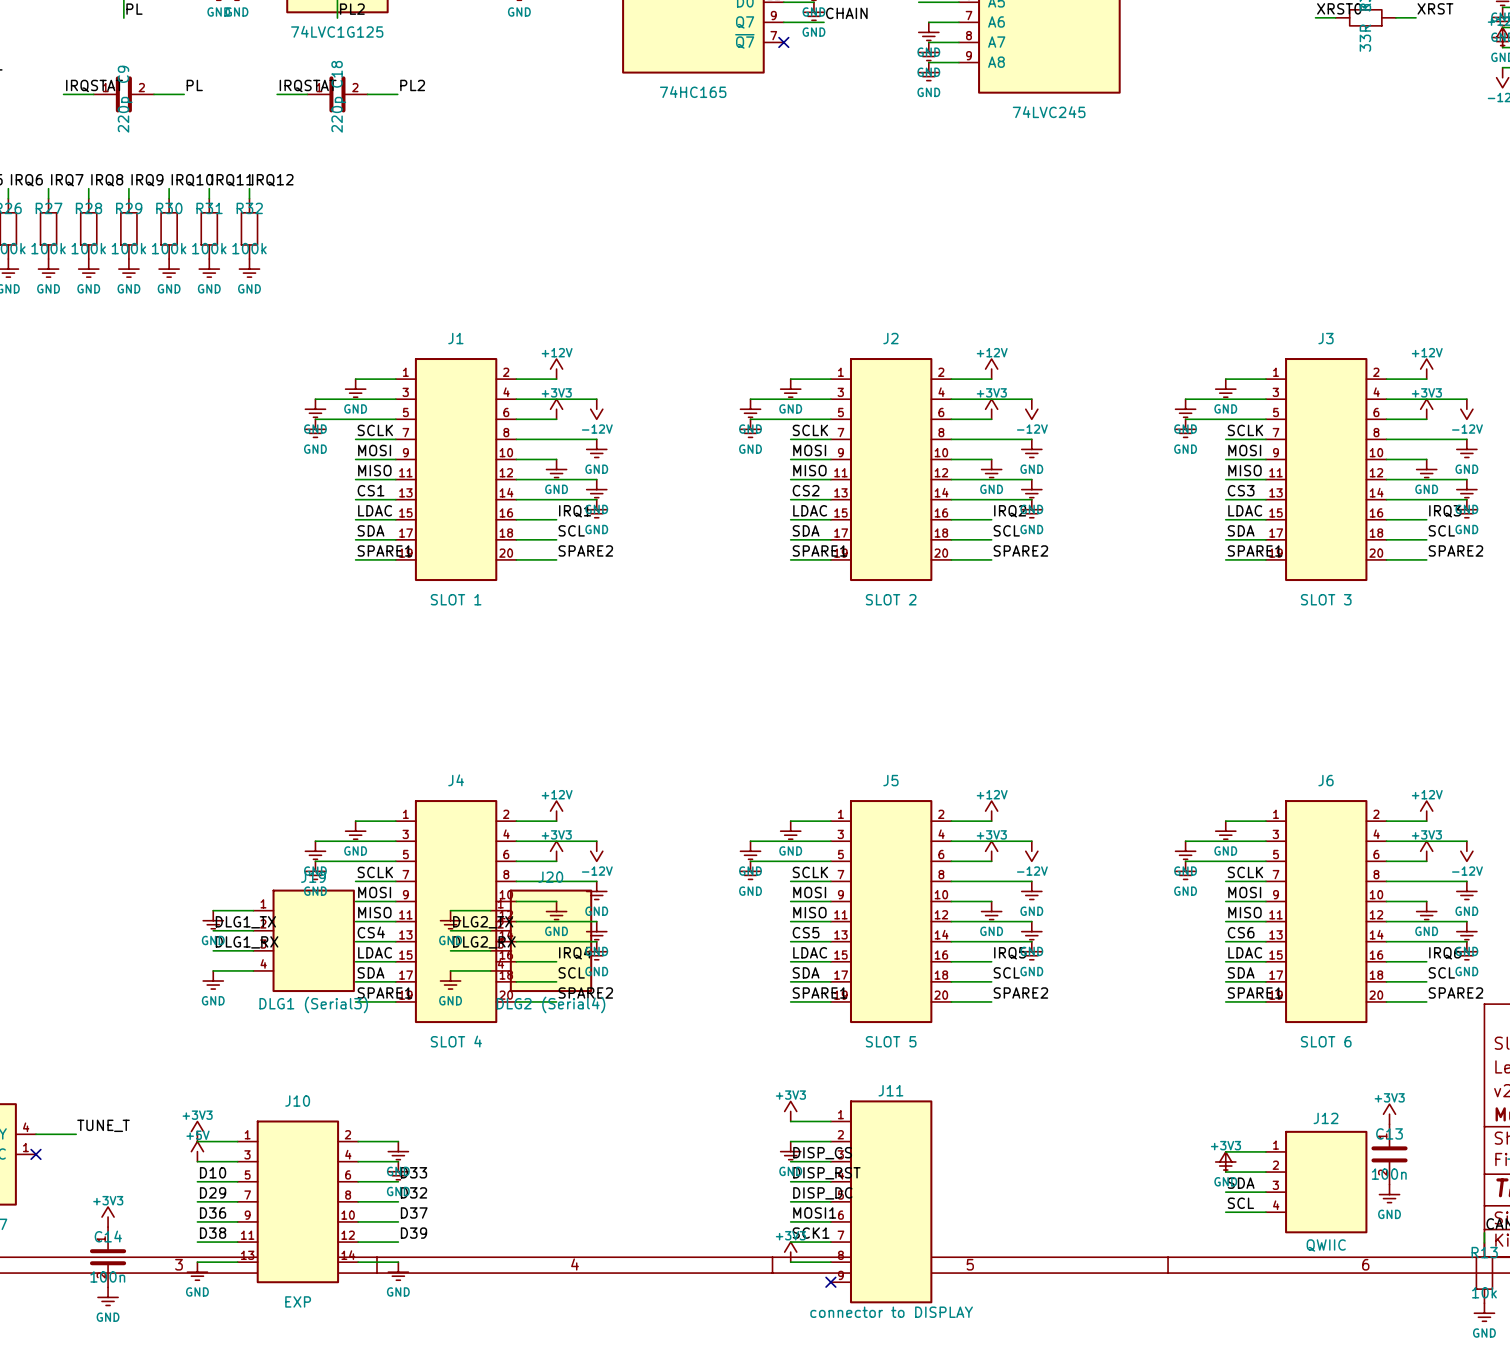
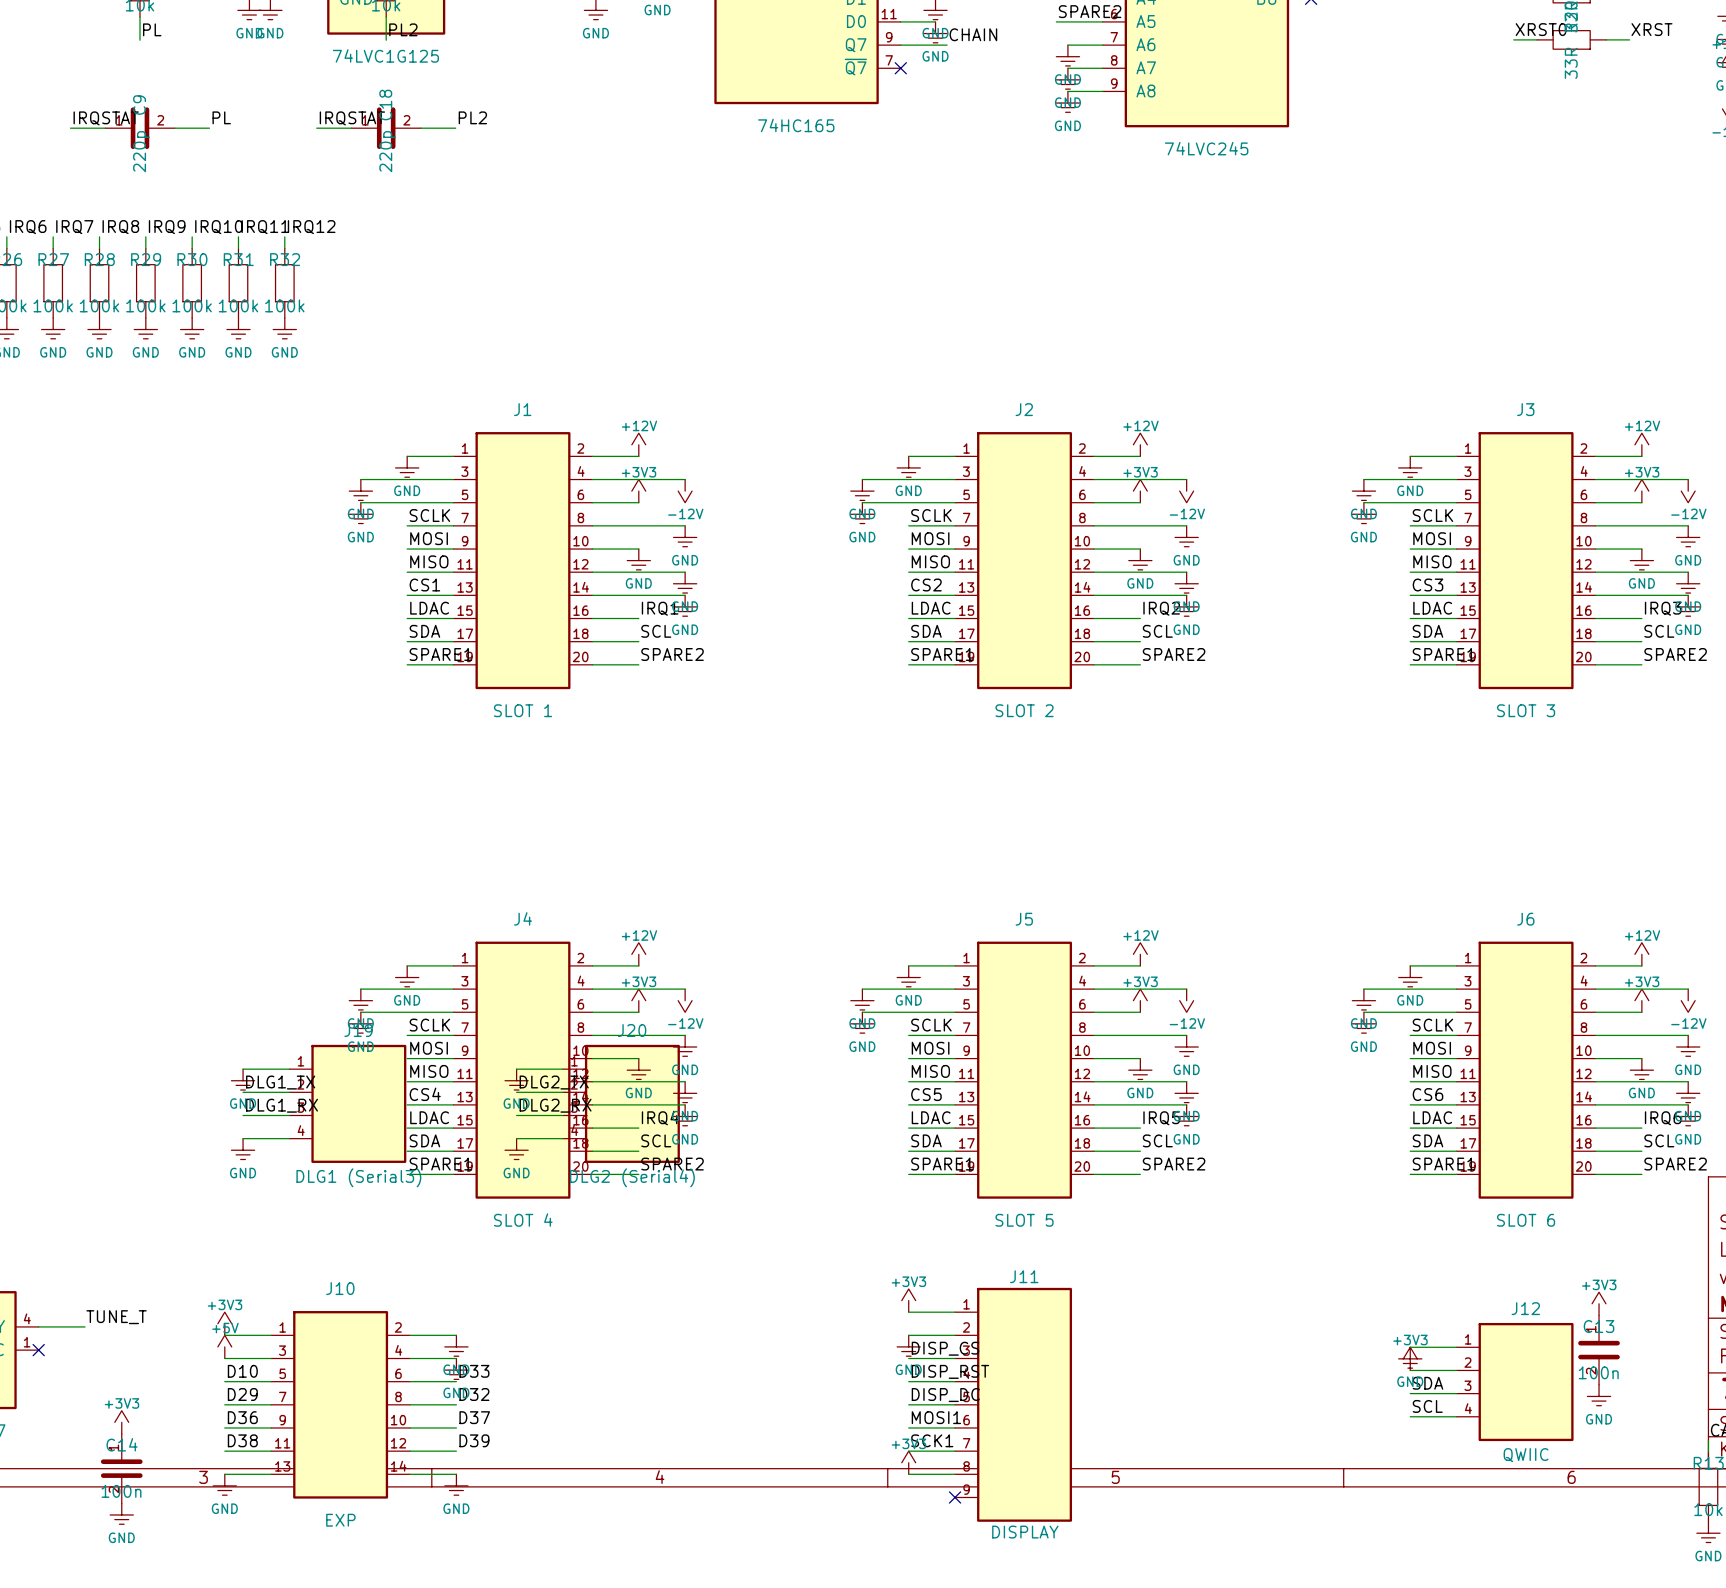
J11 value: connector to DISPLAY (891, 1312) -> DISPLAY (1025, 1532)

